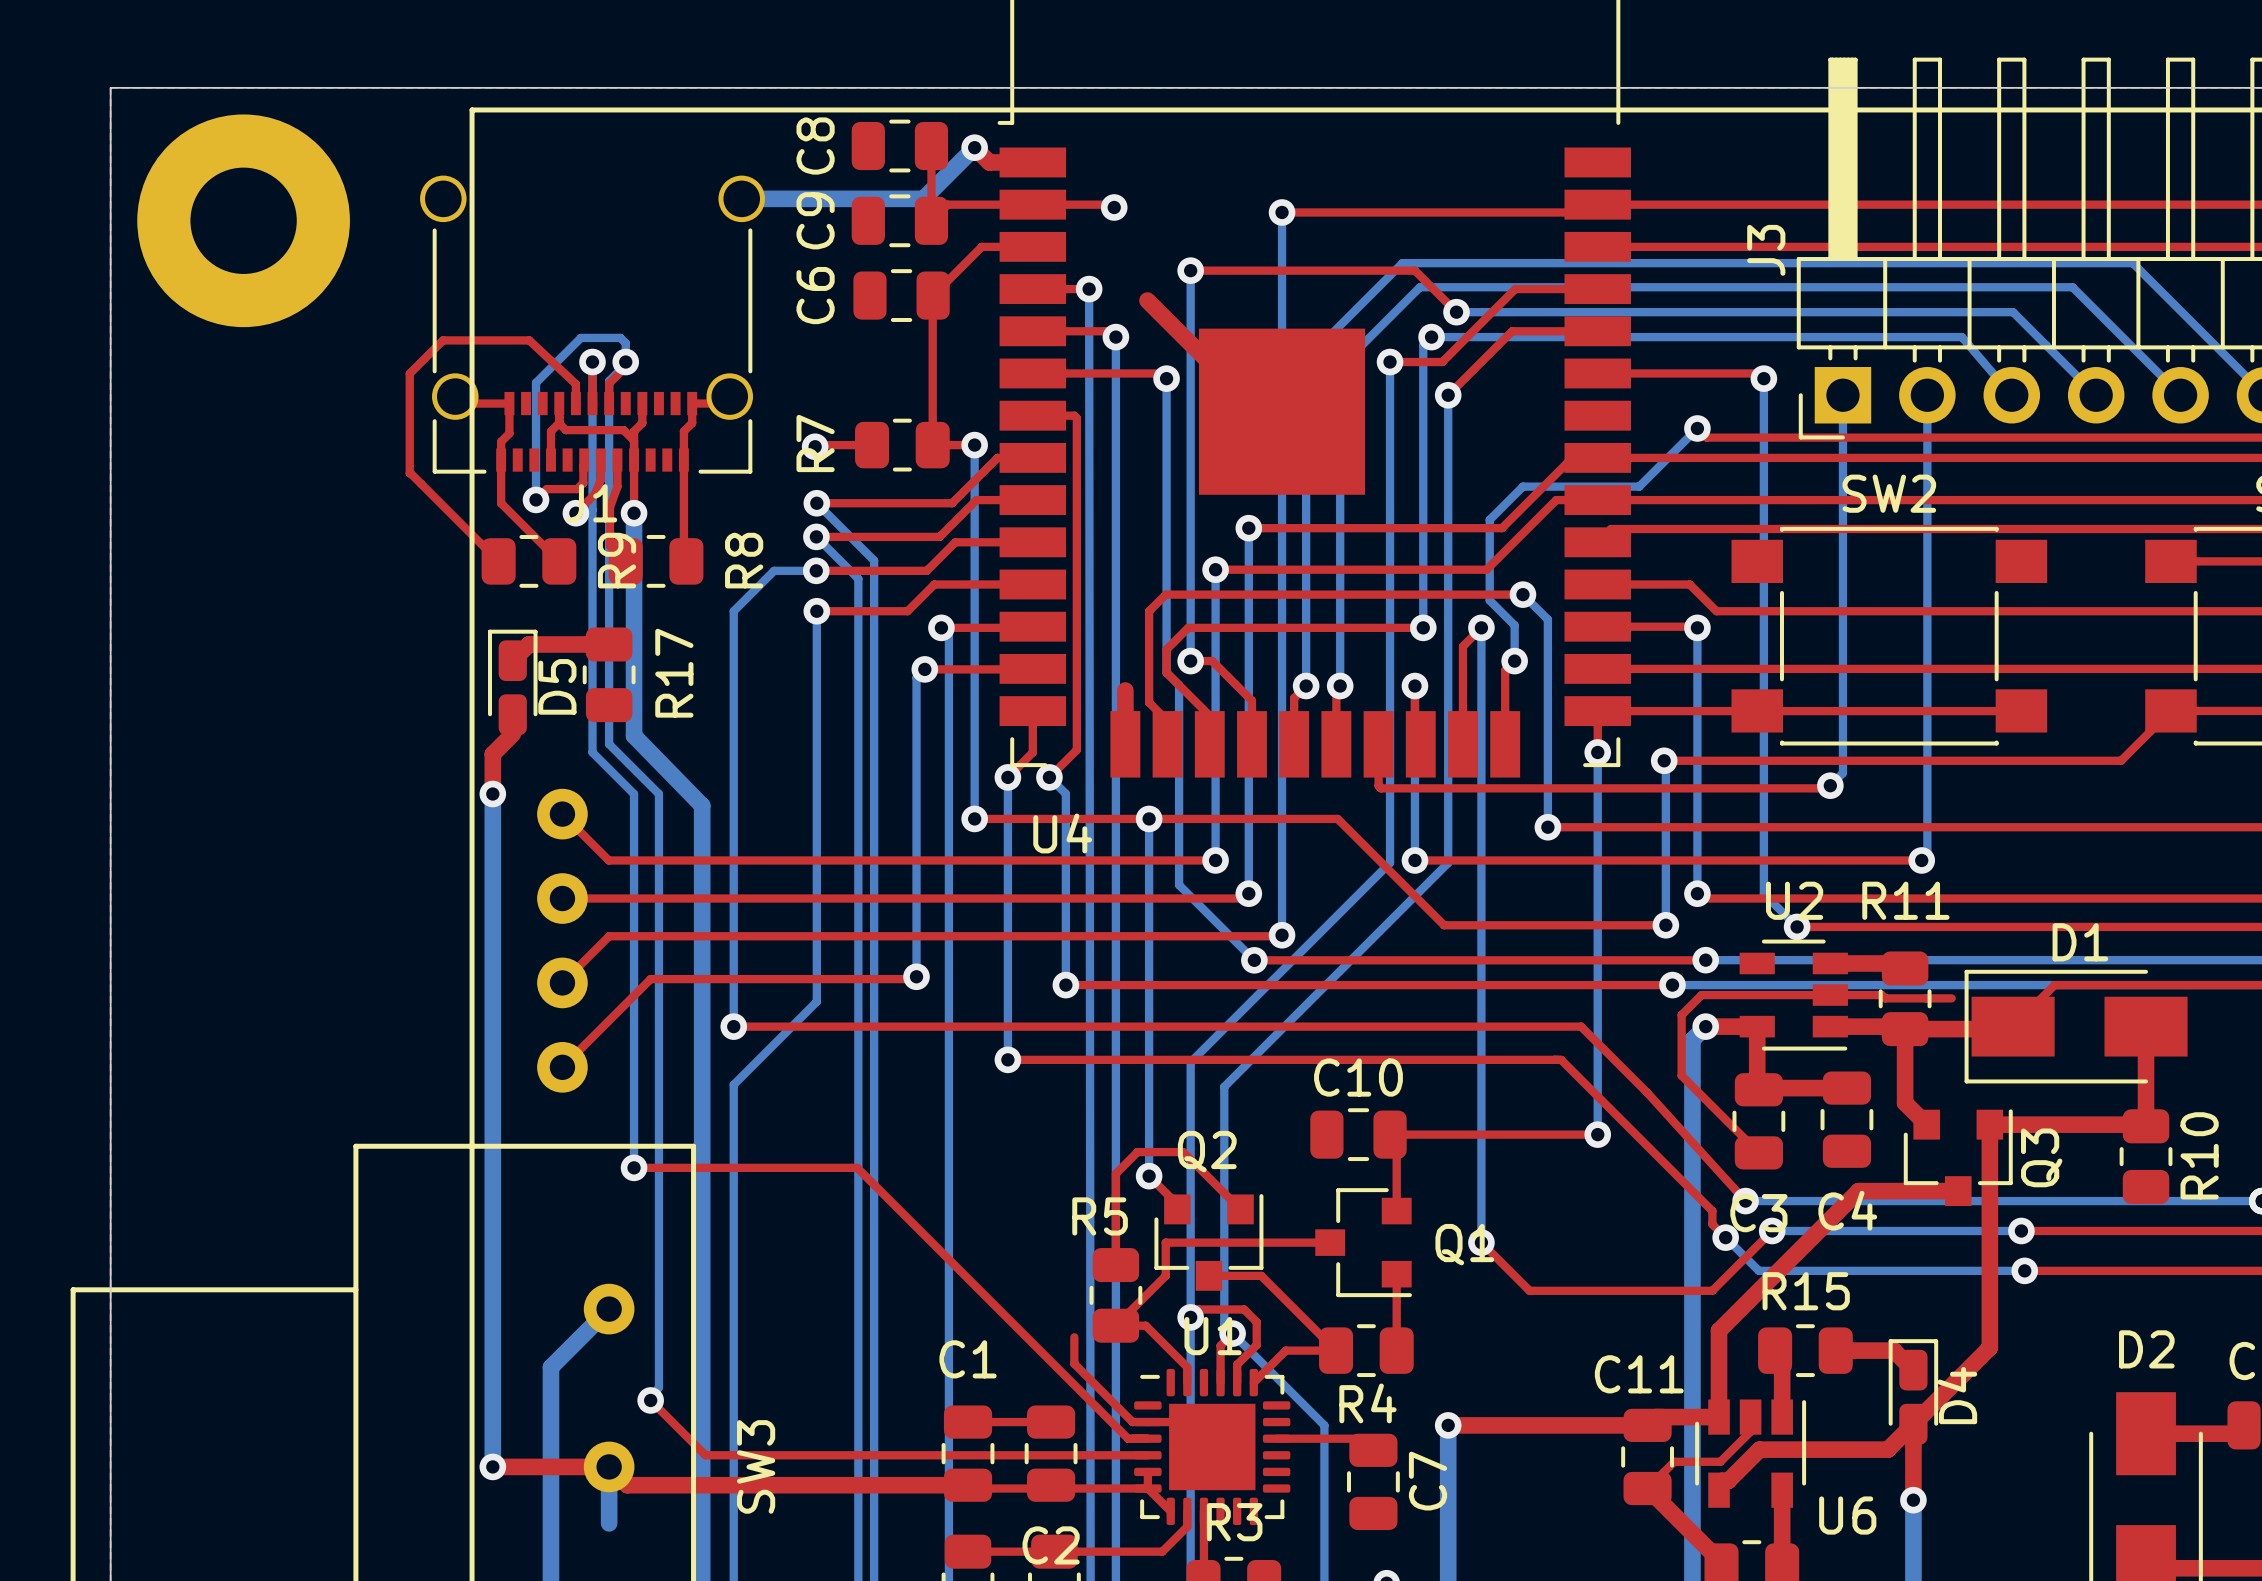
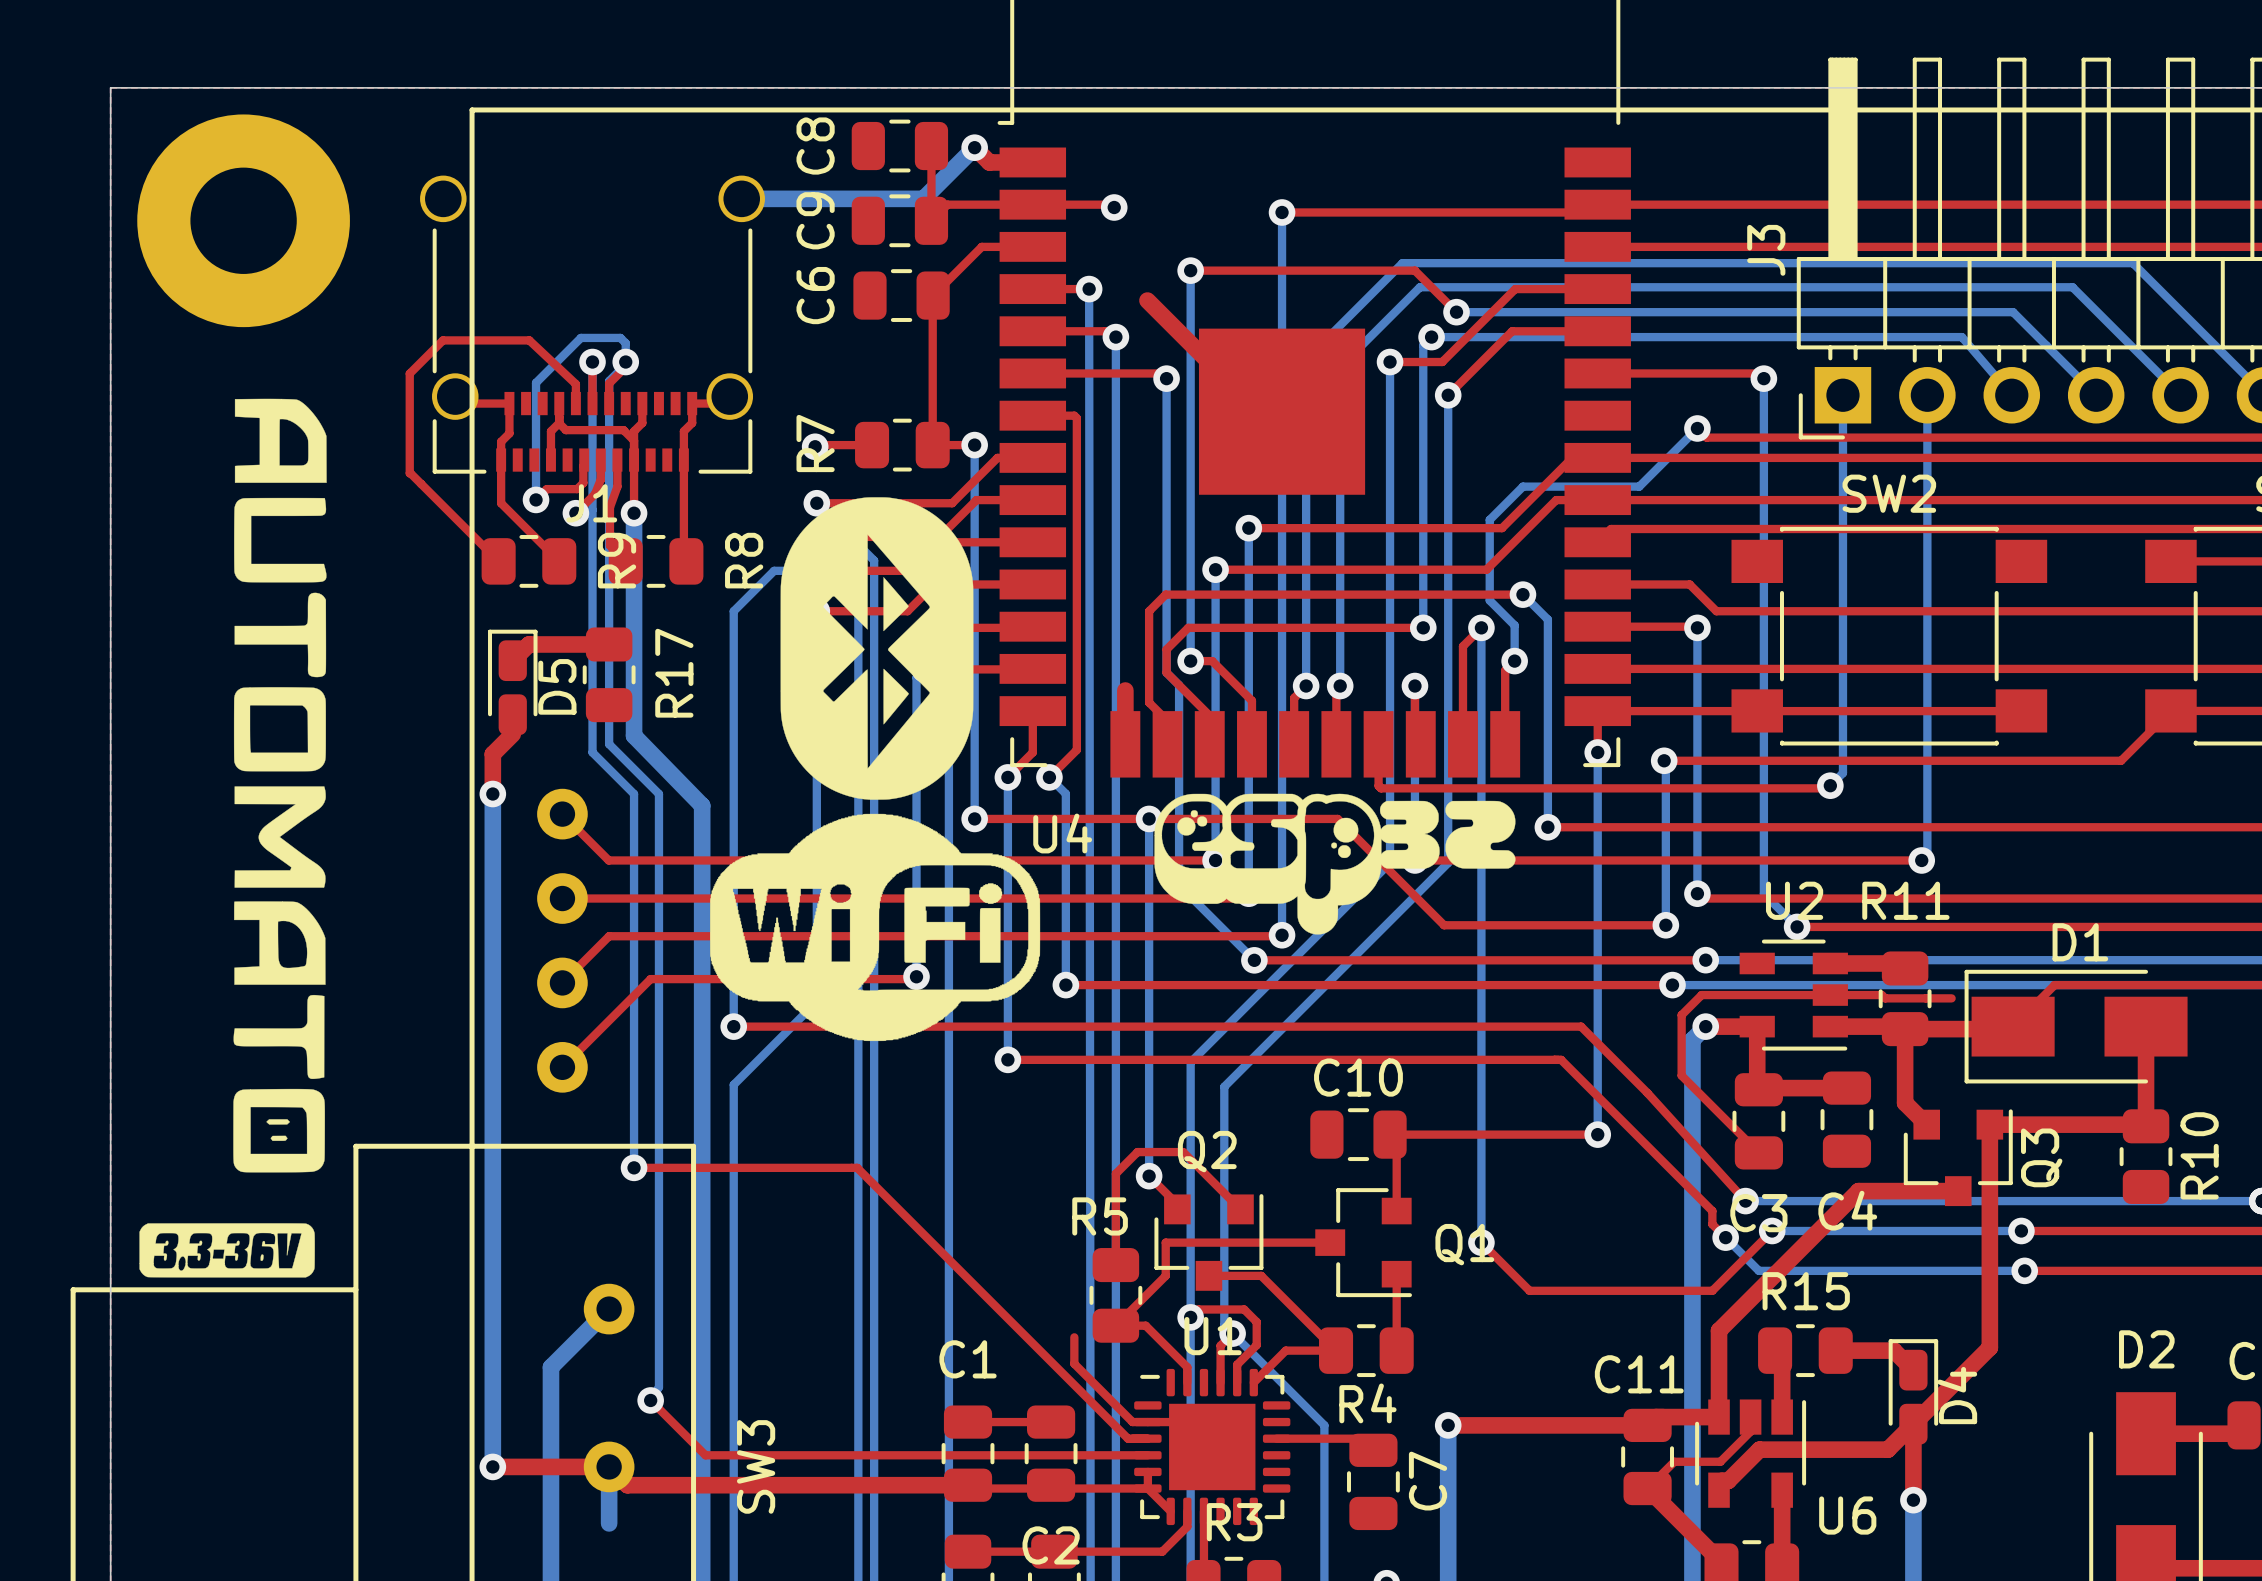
drawing: none -> [233, 398, 327, 1173]
drawing: none -> [710, 497, 1041, 1042]
drawing: none -> [1154, 793, 1516, 935]
drawing: none -> [139, 1223, 315, 1278]

